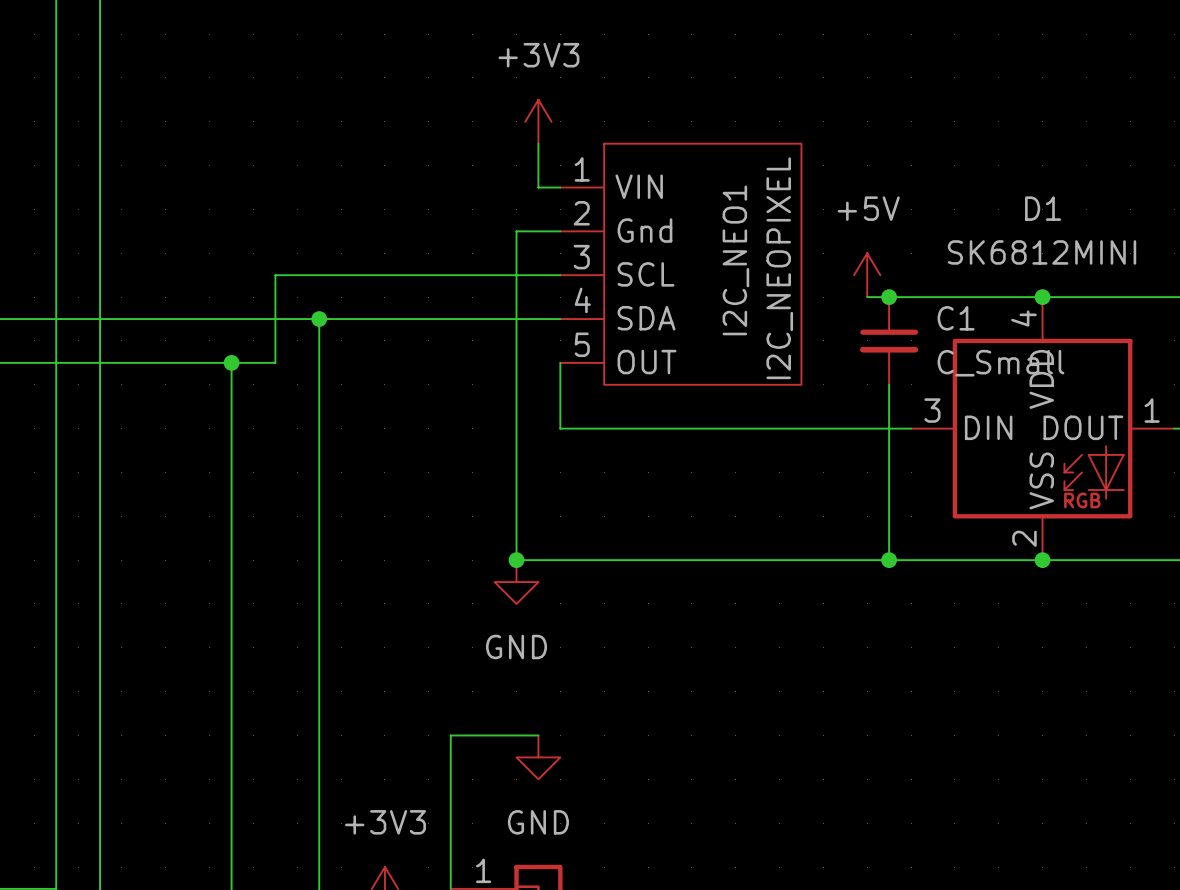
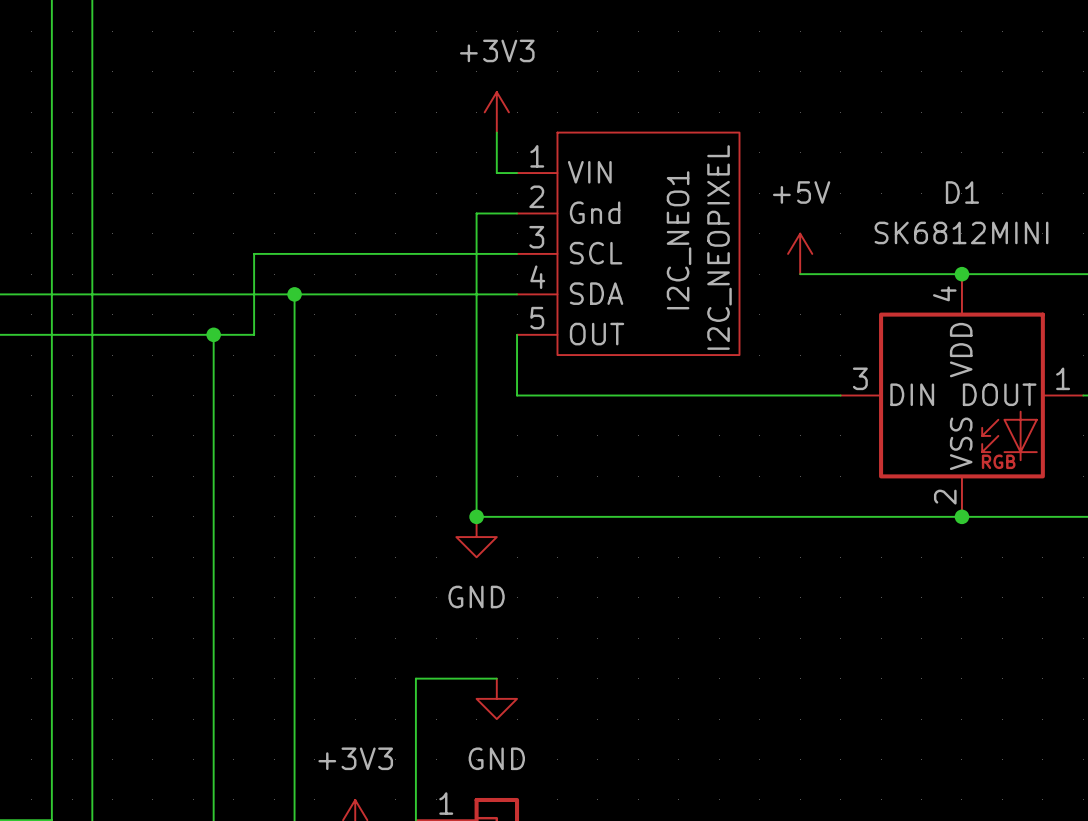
junction: (889, 297) -> none
C1: C_Small (889, 340) -> none
wire: (889, 384) (889, 560) -> none
junction: (889, 560) -> none

